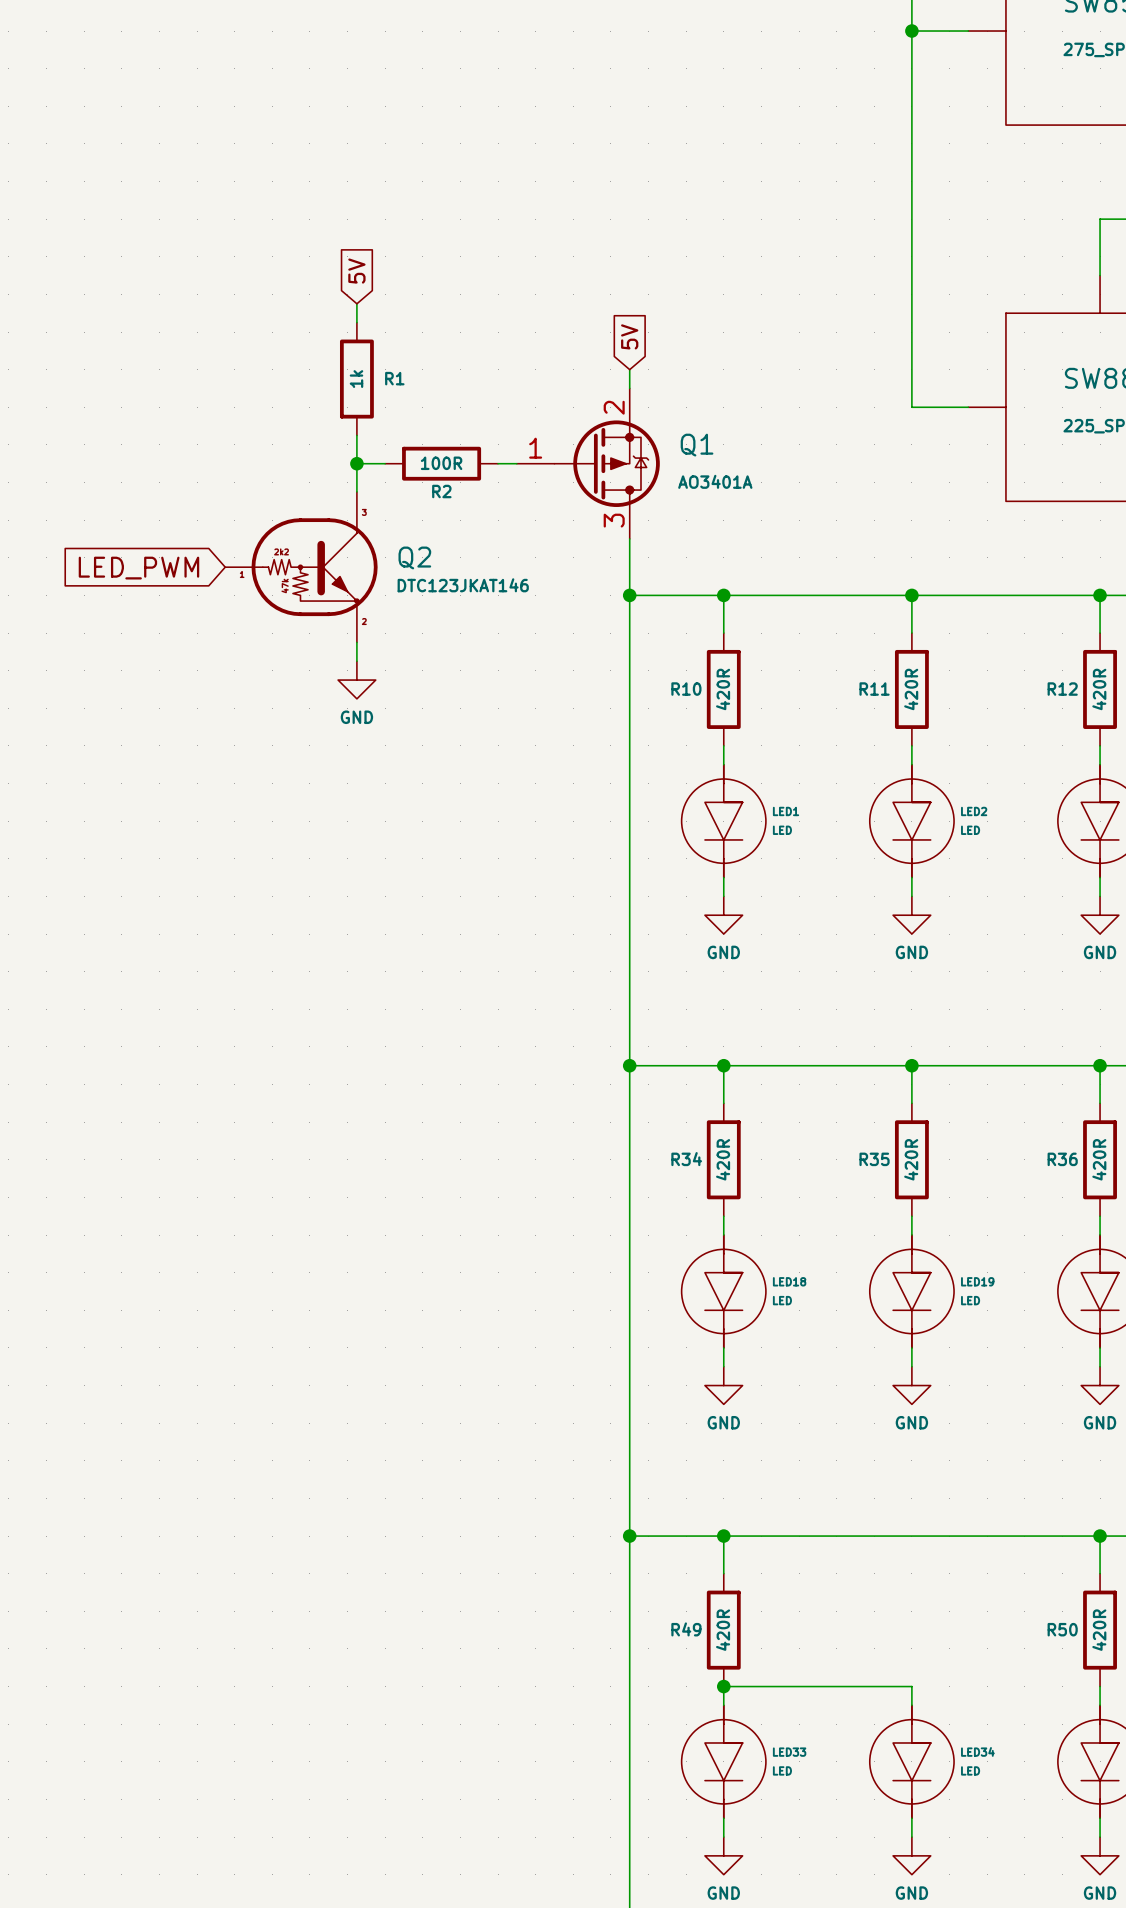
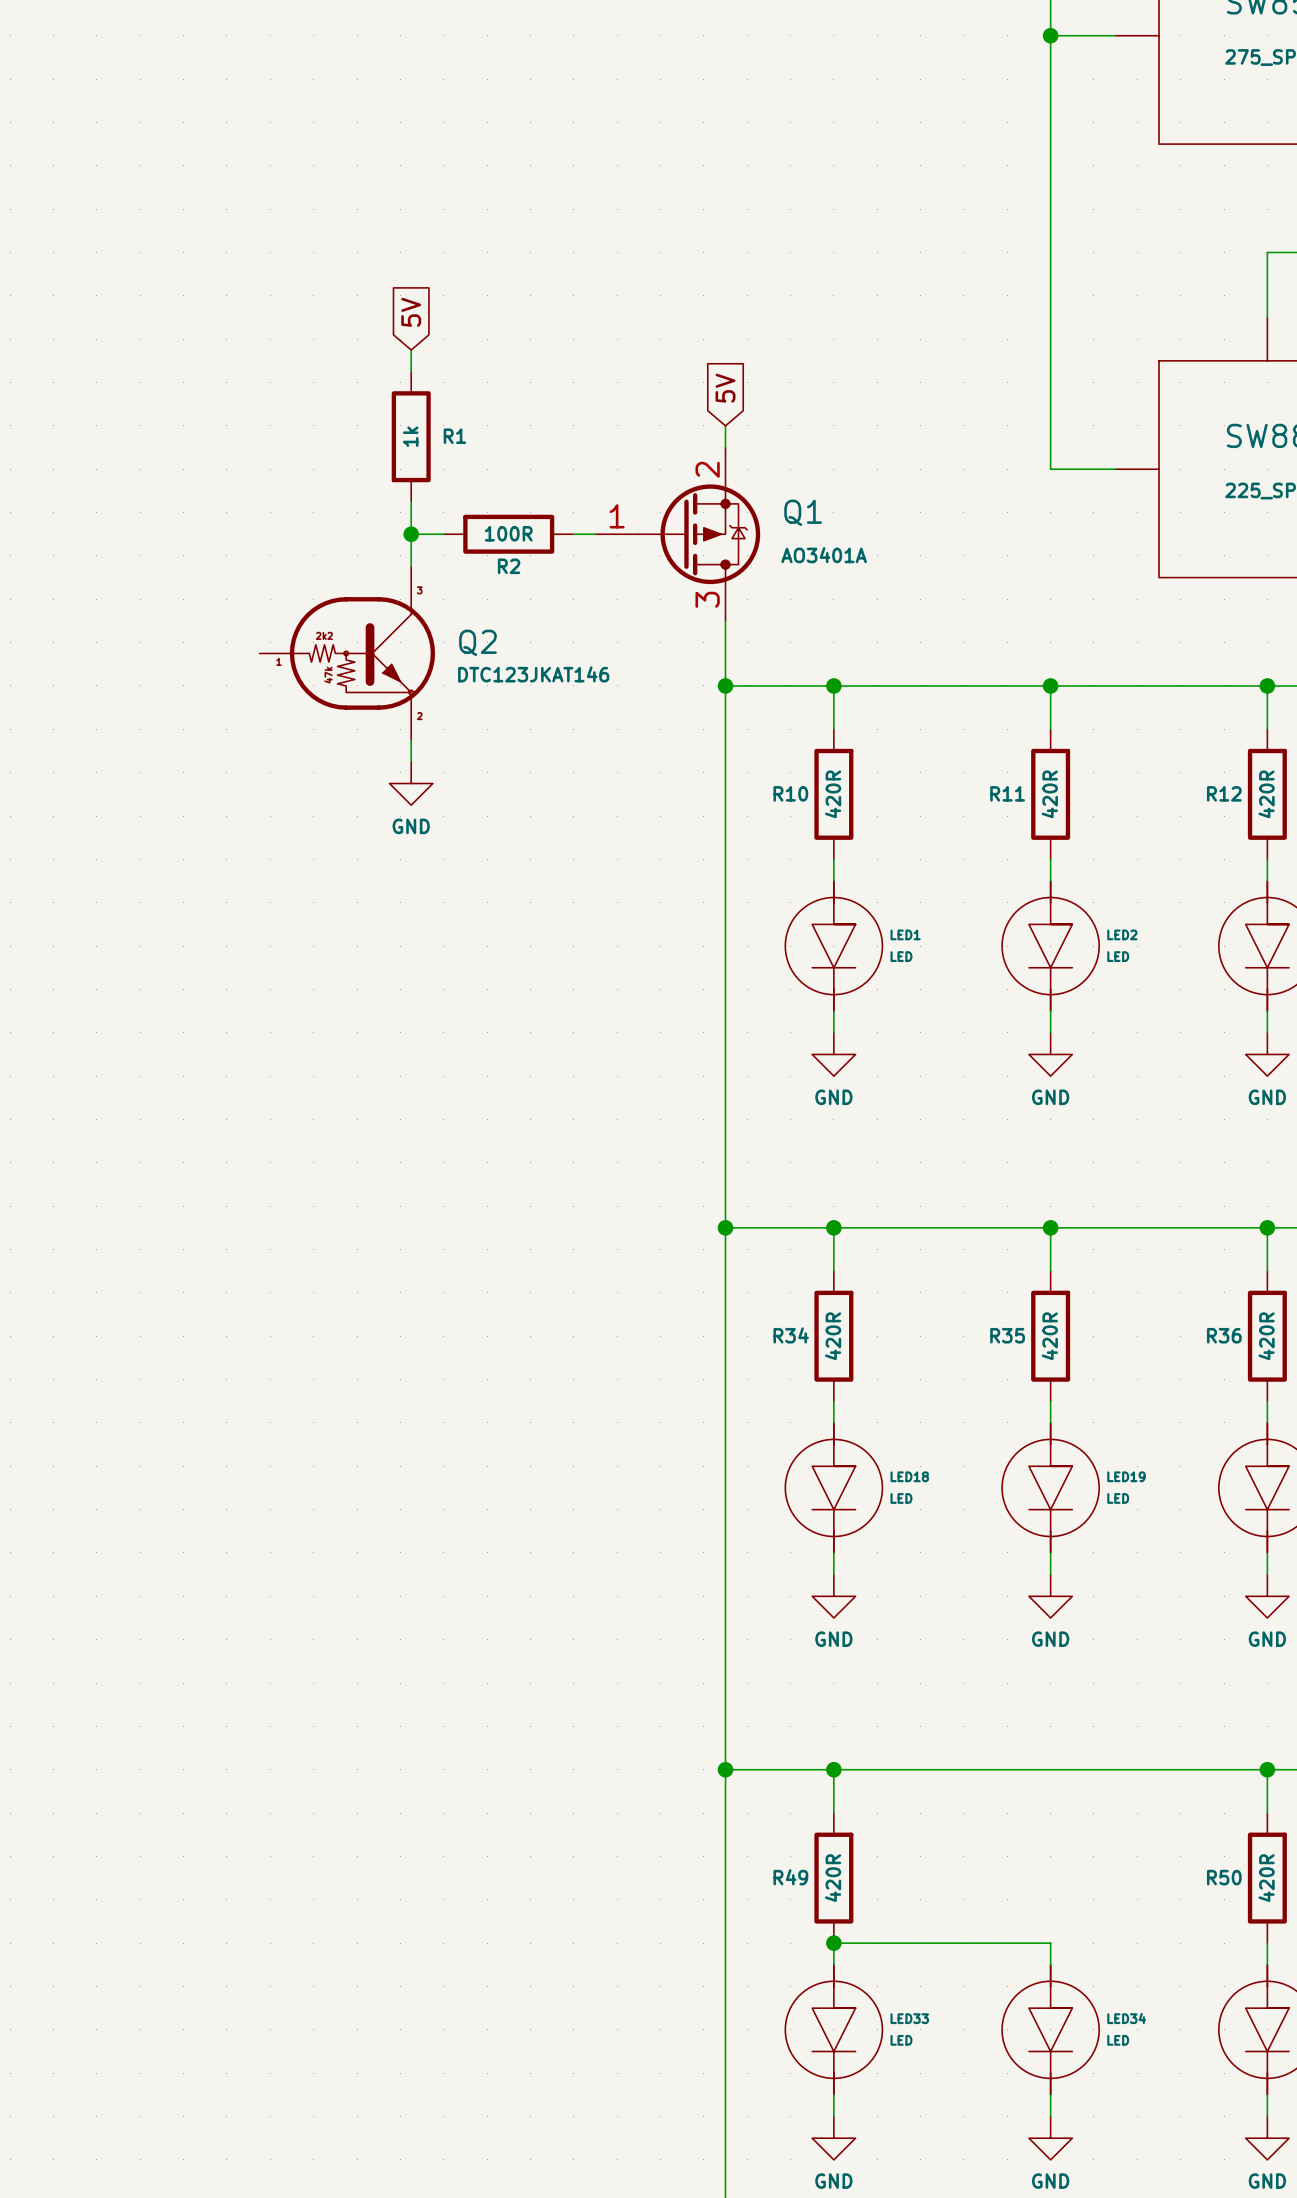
global label: LED_PWM (138, 568) -> none

